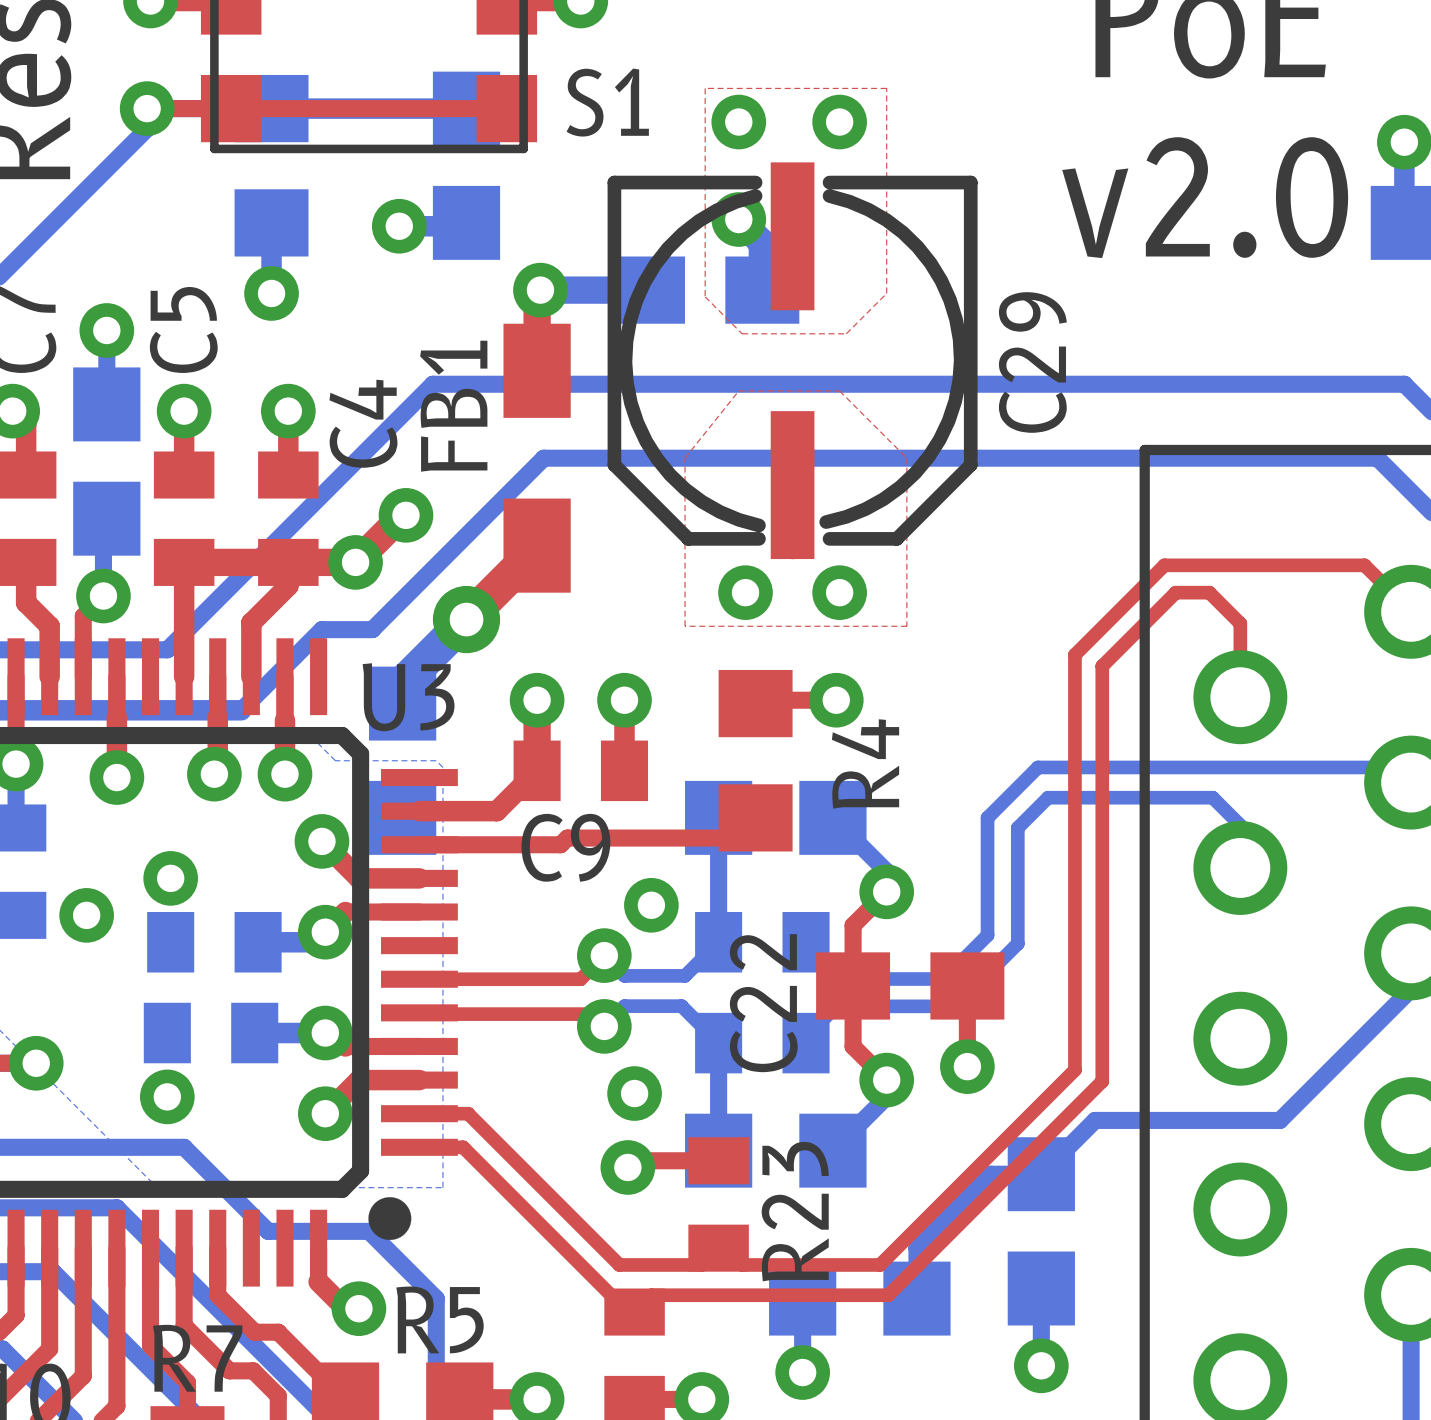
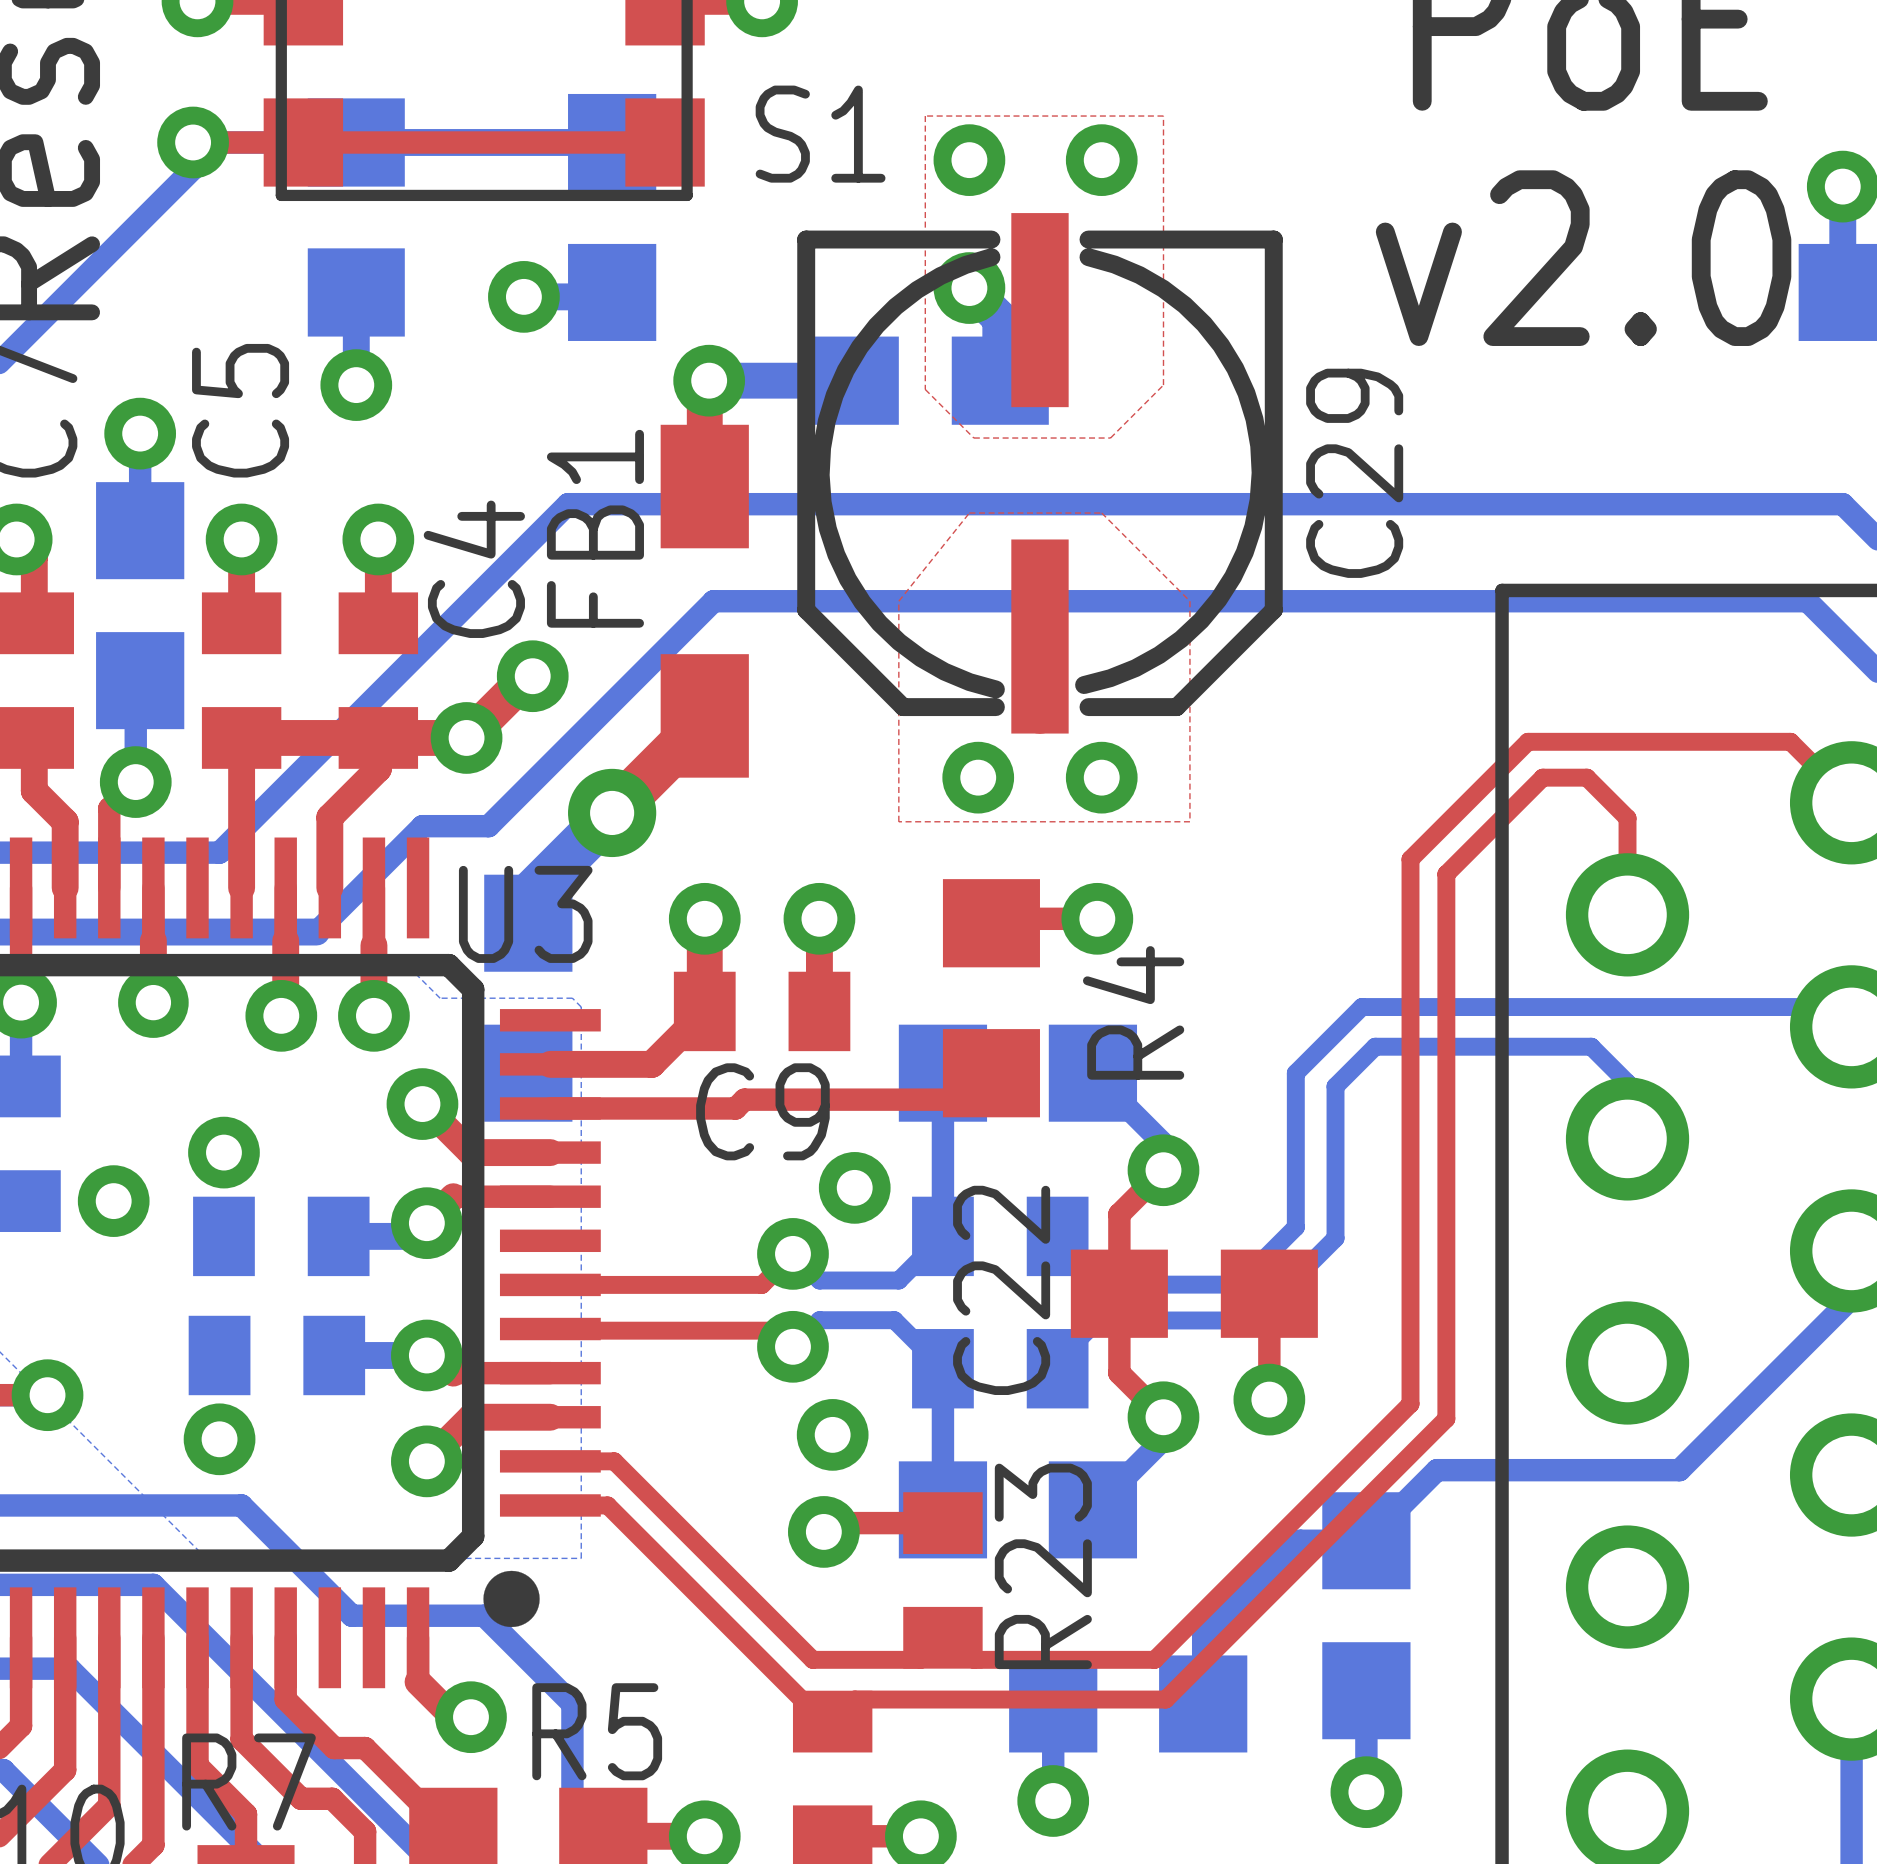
via position: (116, 777) -> (153, 1002)

